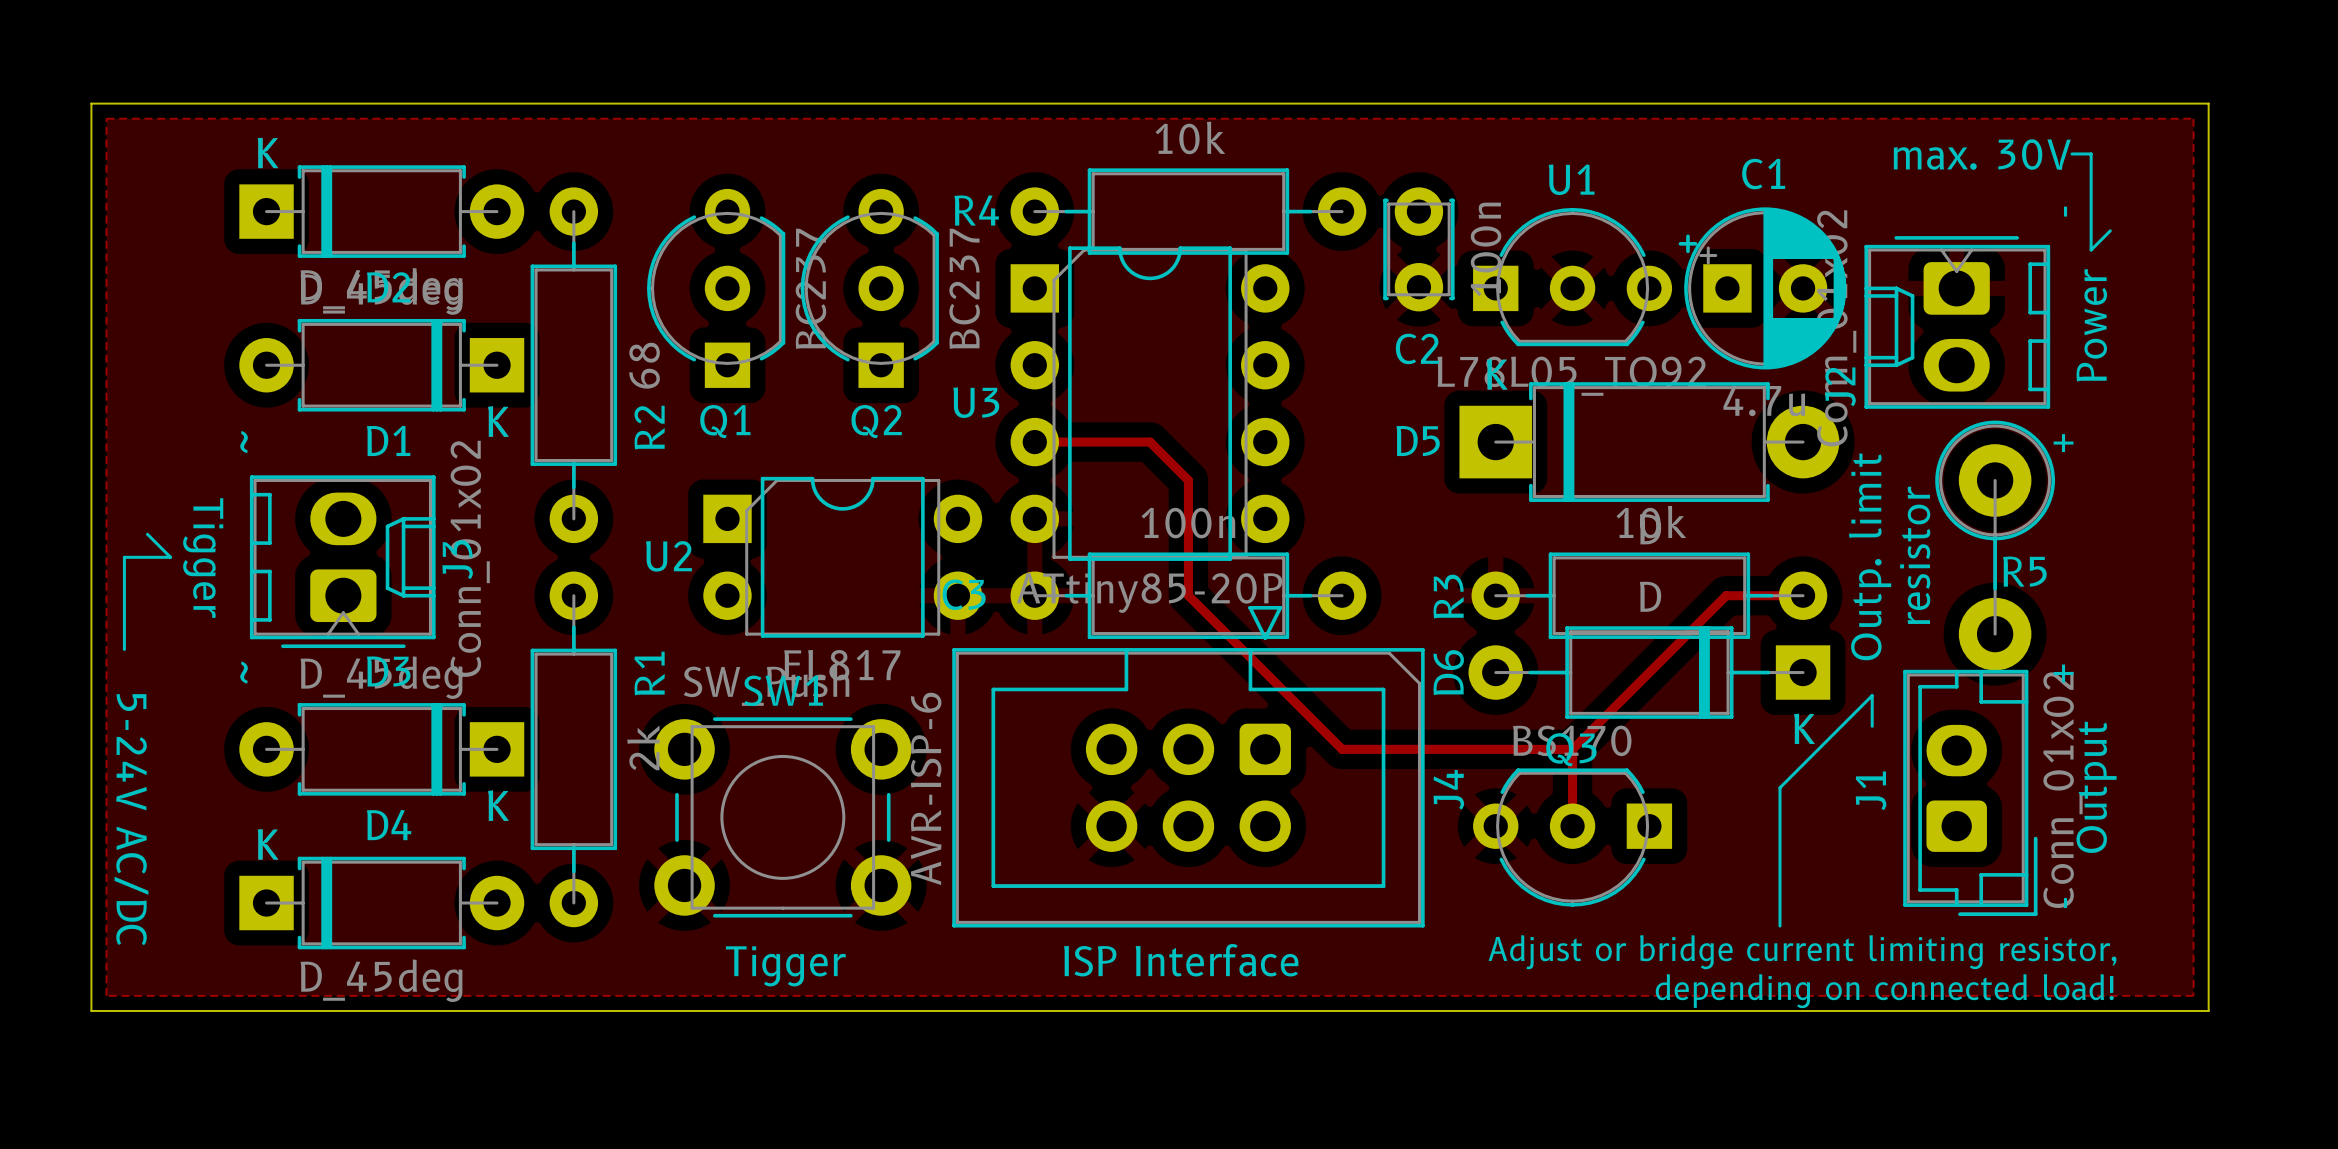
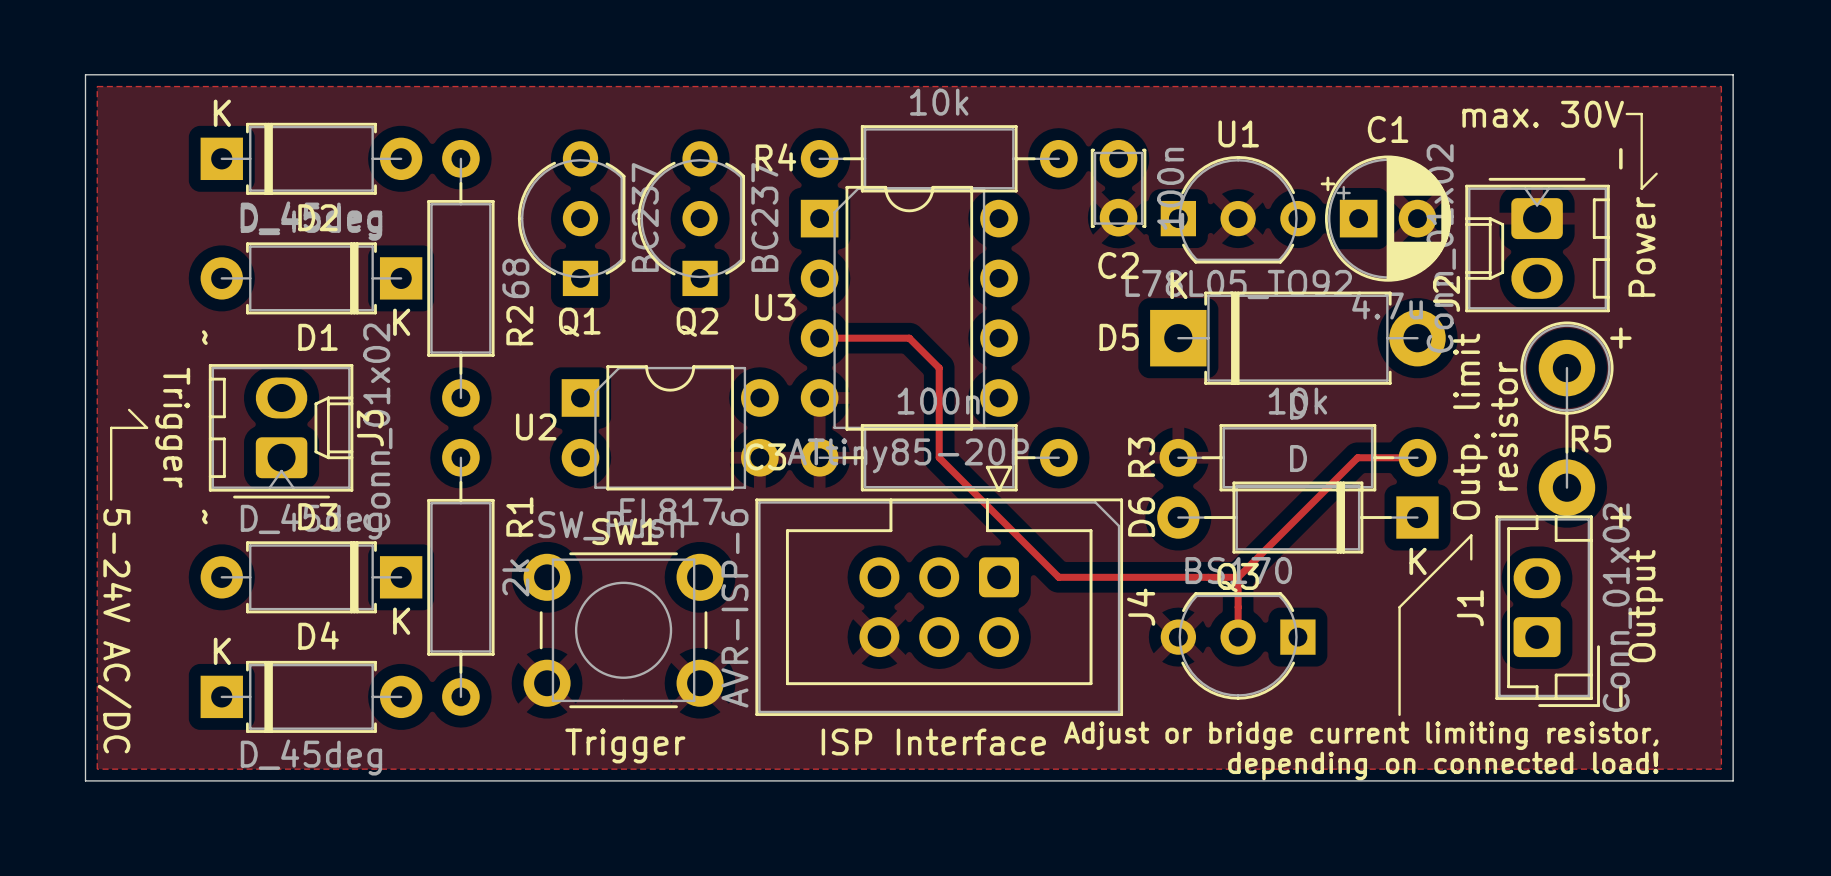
text: Tigger (203, 558) -> Trigger (172, 427)
text: Tigger (785, 966) -> Trigger (625, 745)

